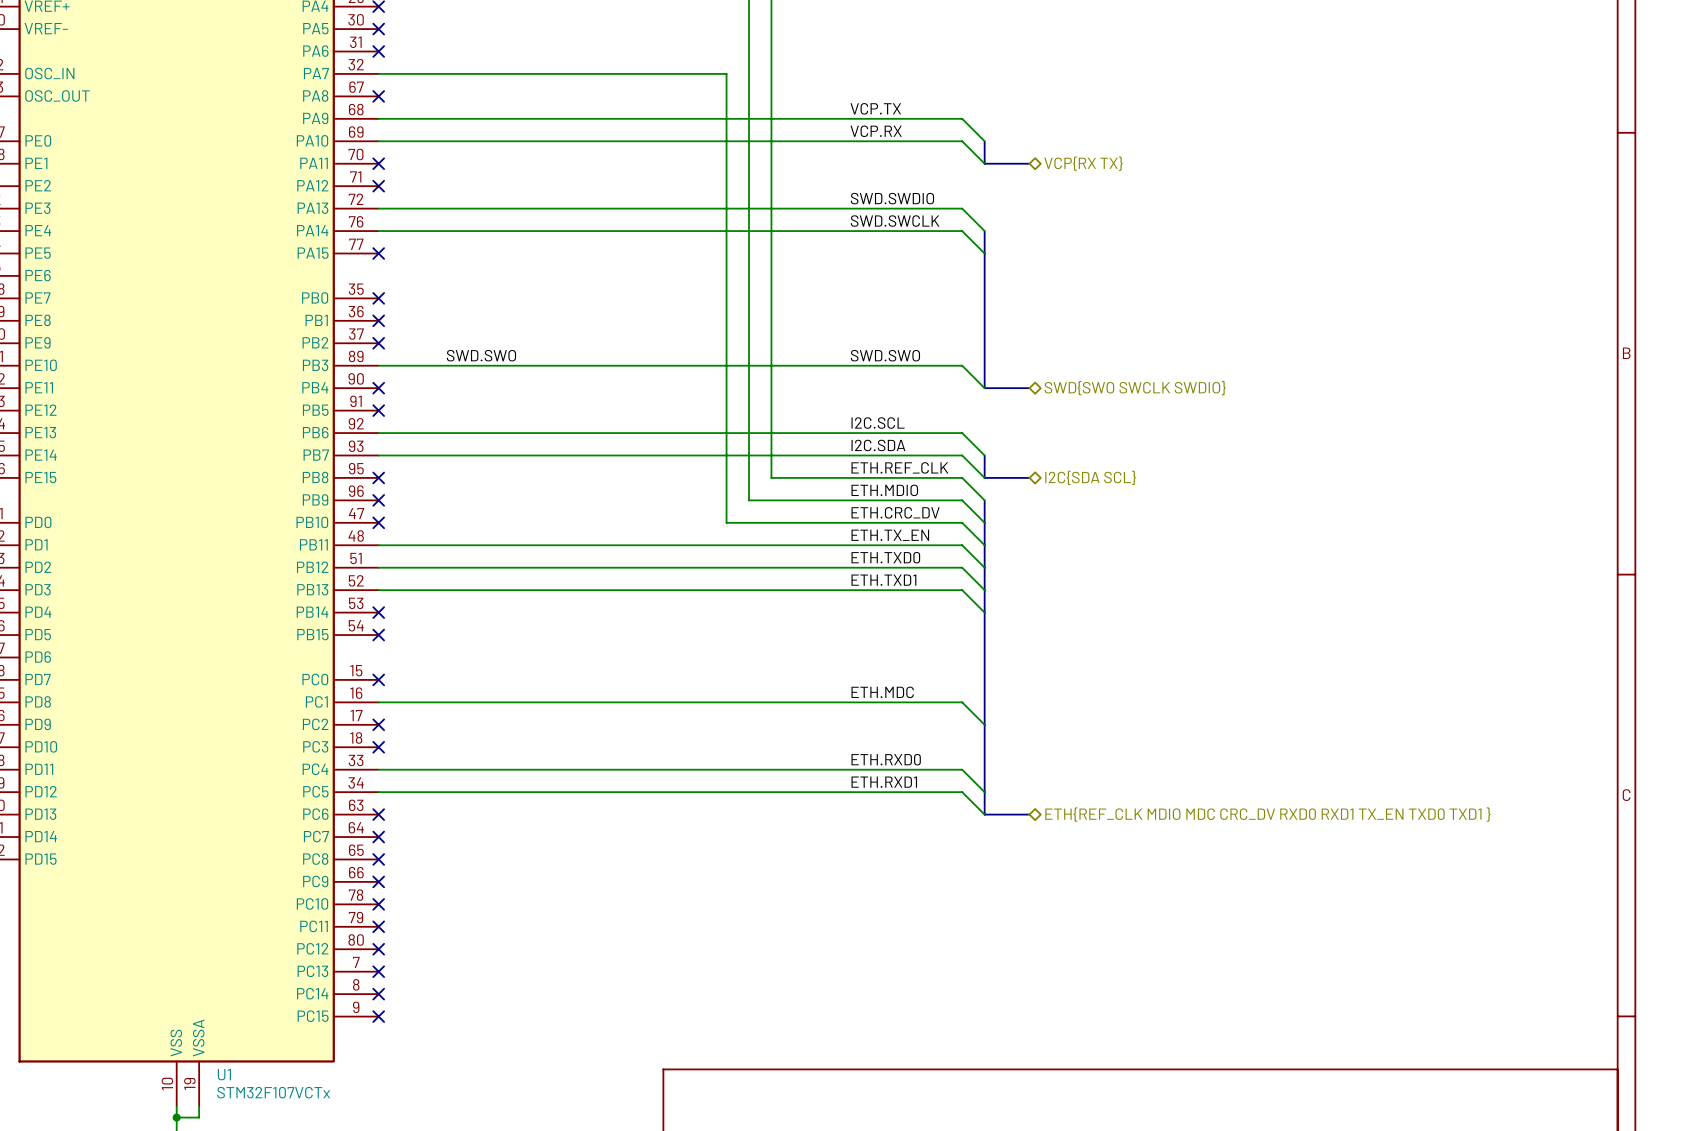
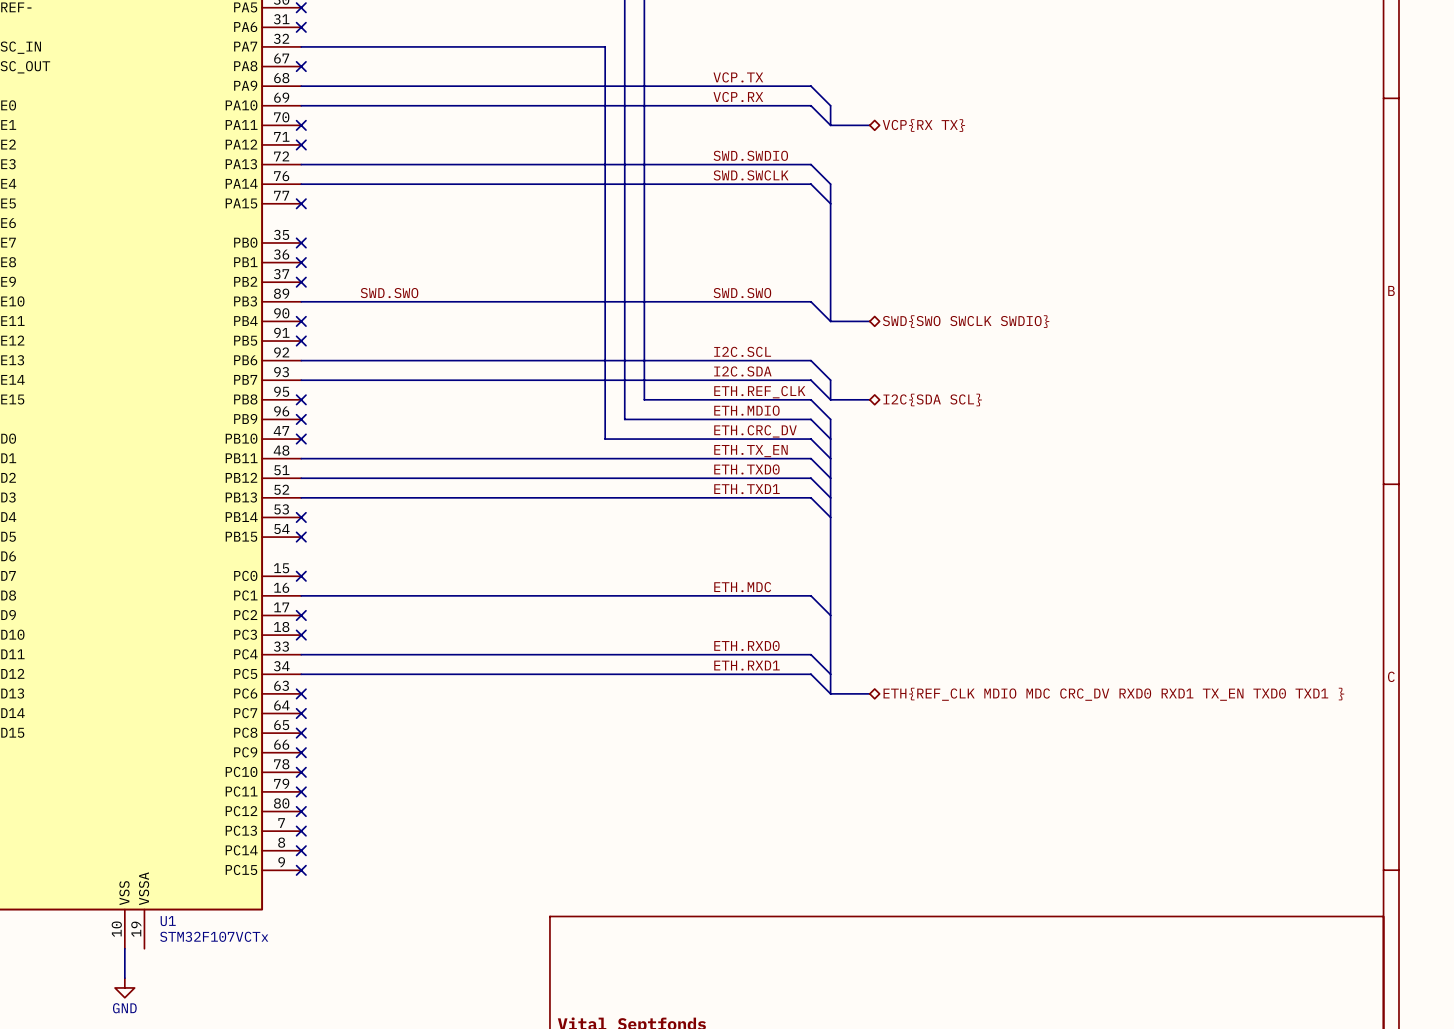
wire: (199, 1106) (199, 1117) (176, 1117) -> none
junction: (176, 1117) -> none

